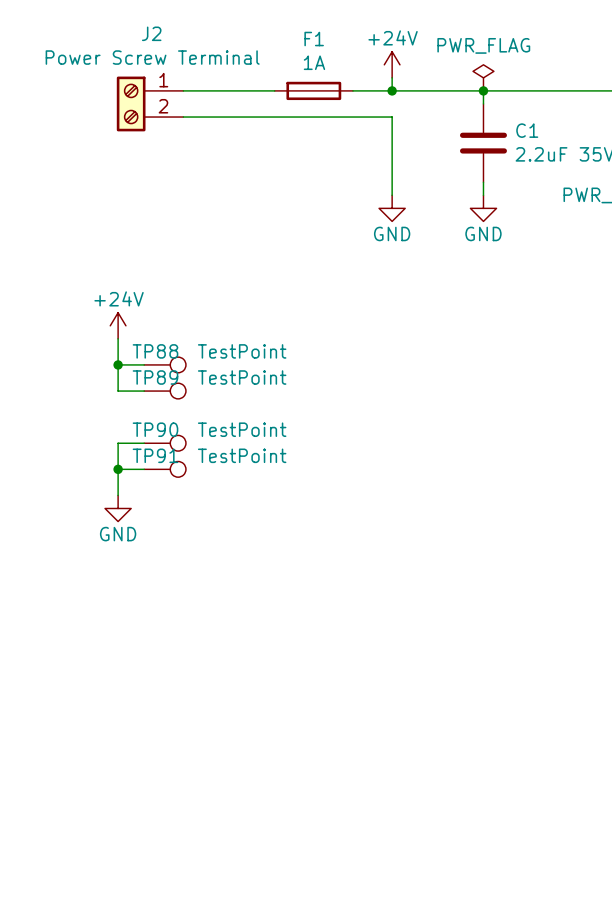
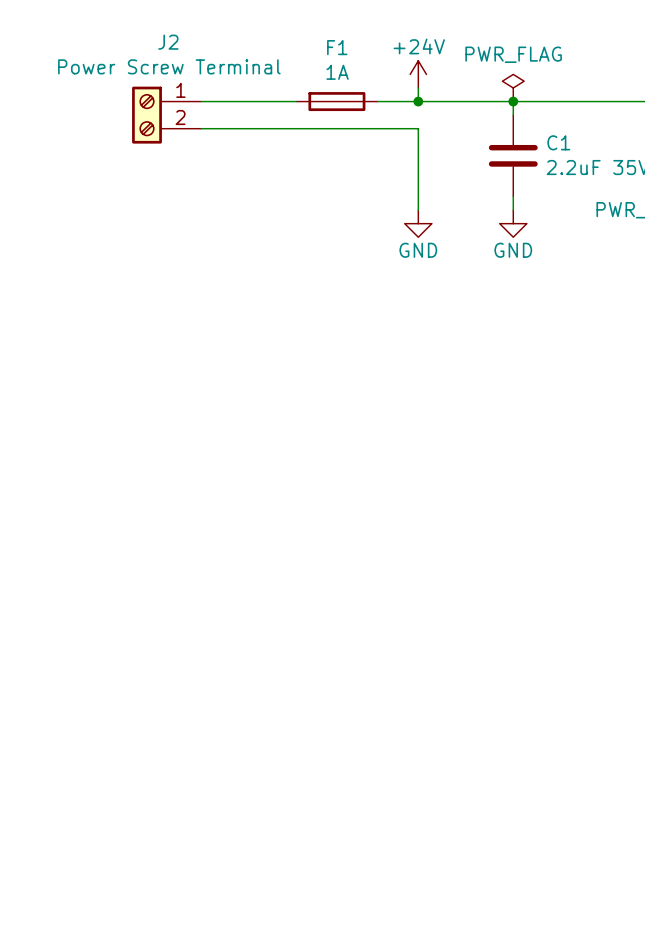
power symbol: +24V (118, 325) -> none
wire: (118, 338) (118, 391) (144, 391) -> none
wire: (118, 364) (144, 364) -> none
junction: (118, 364) -> none
TP88: TestPoint (165, 364) -> none
TP89: TestPoint (165, 391) -> none
wire: (144, 443) (118, 443) (118, 495) -> none
TP90: TestPoint (165, 443) -> none
wire: (118, 469) (144, 469) -> none
junction: (118, 469) -> none
TP91: TestPoint (165, 469) -> none
power symbol: GND (118, 508) -> none

